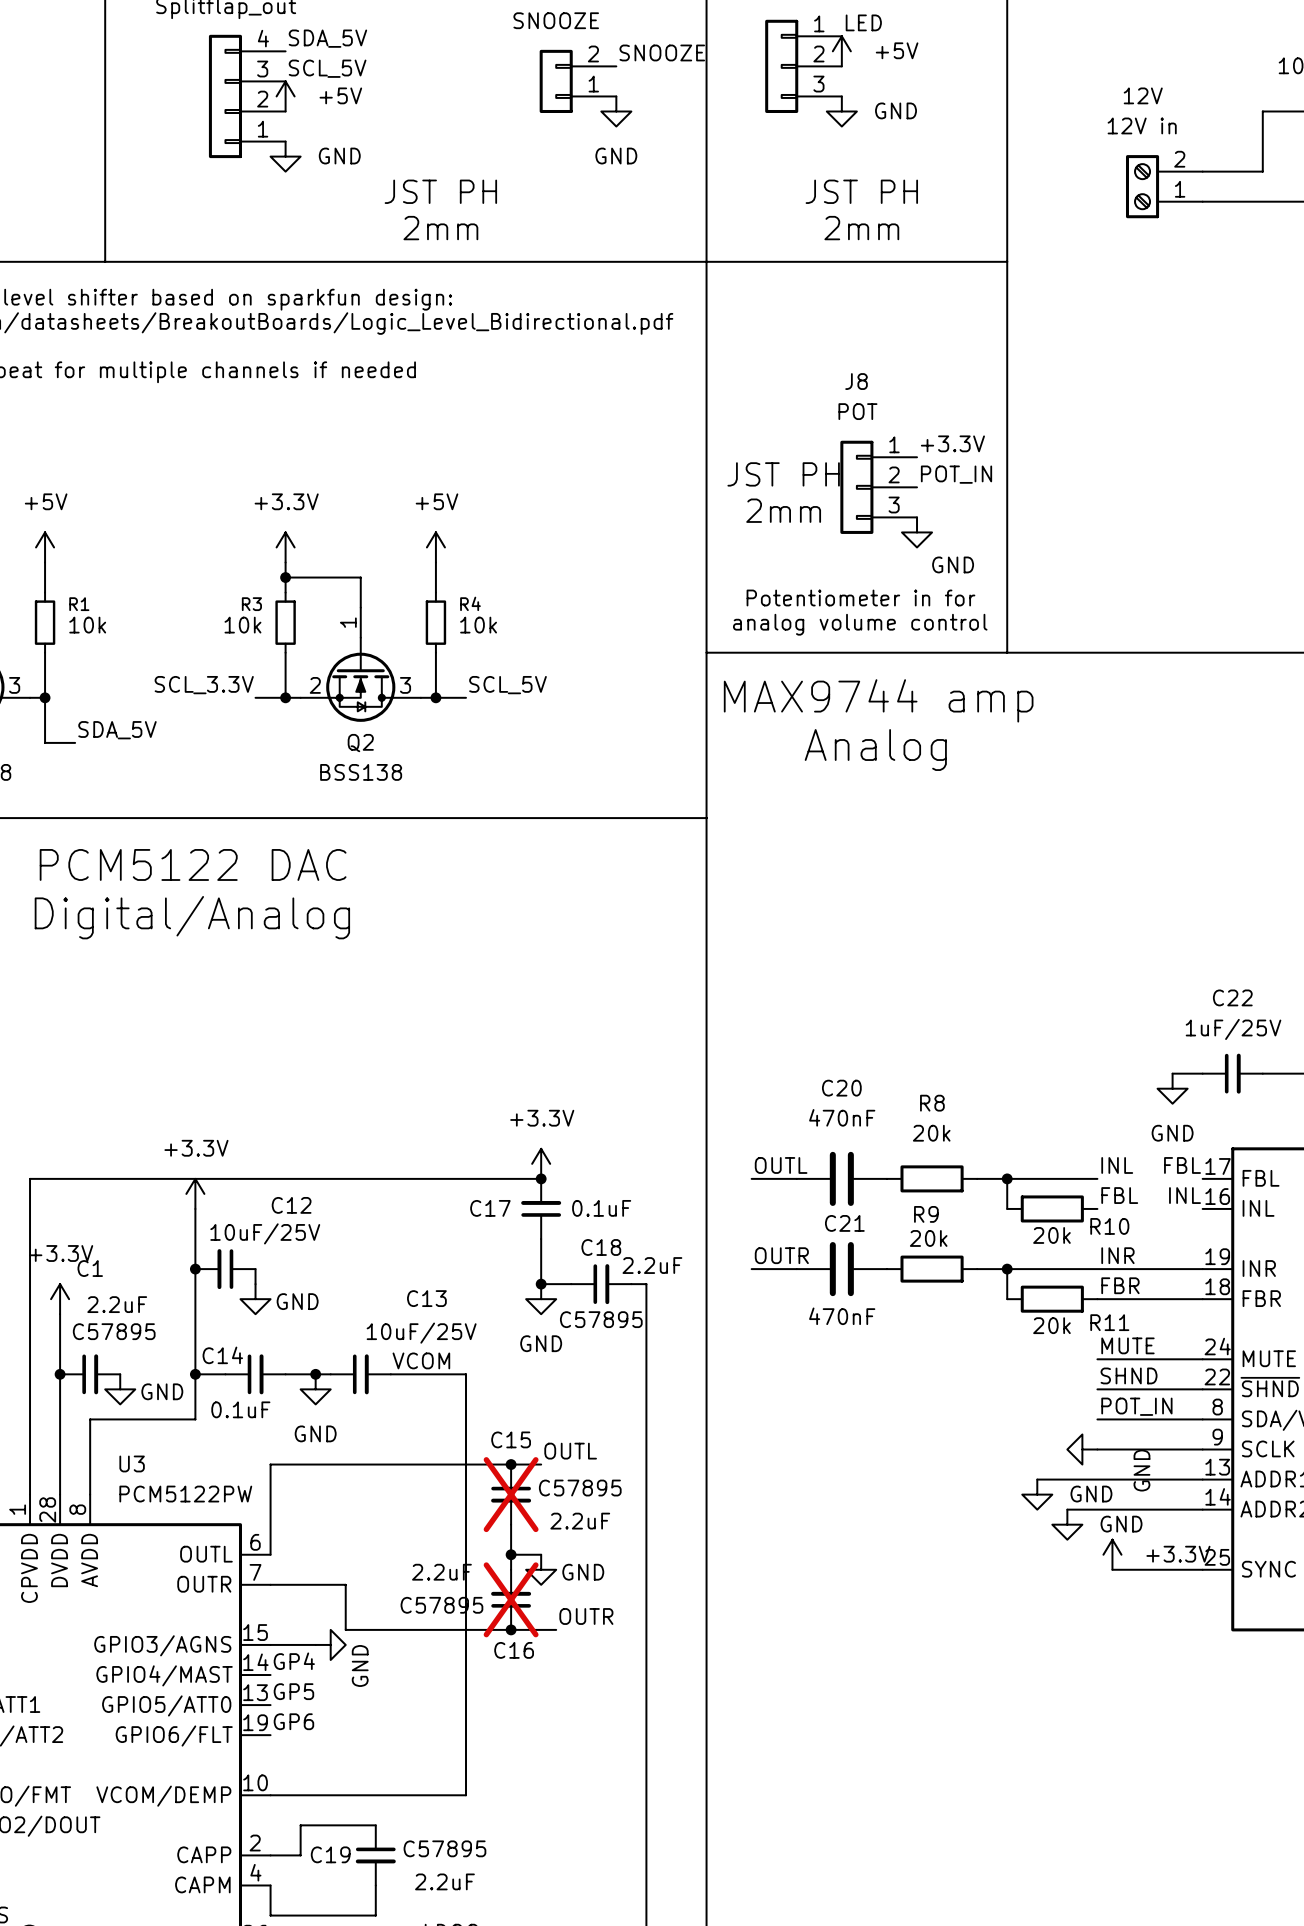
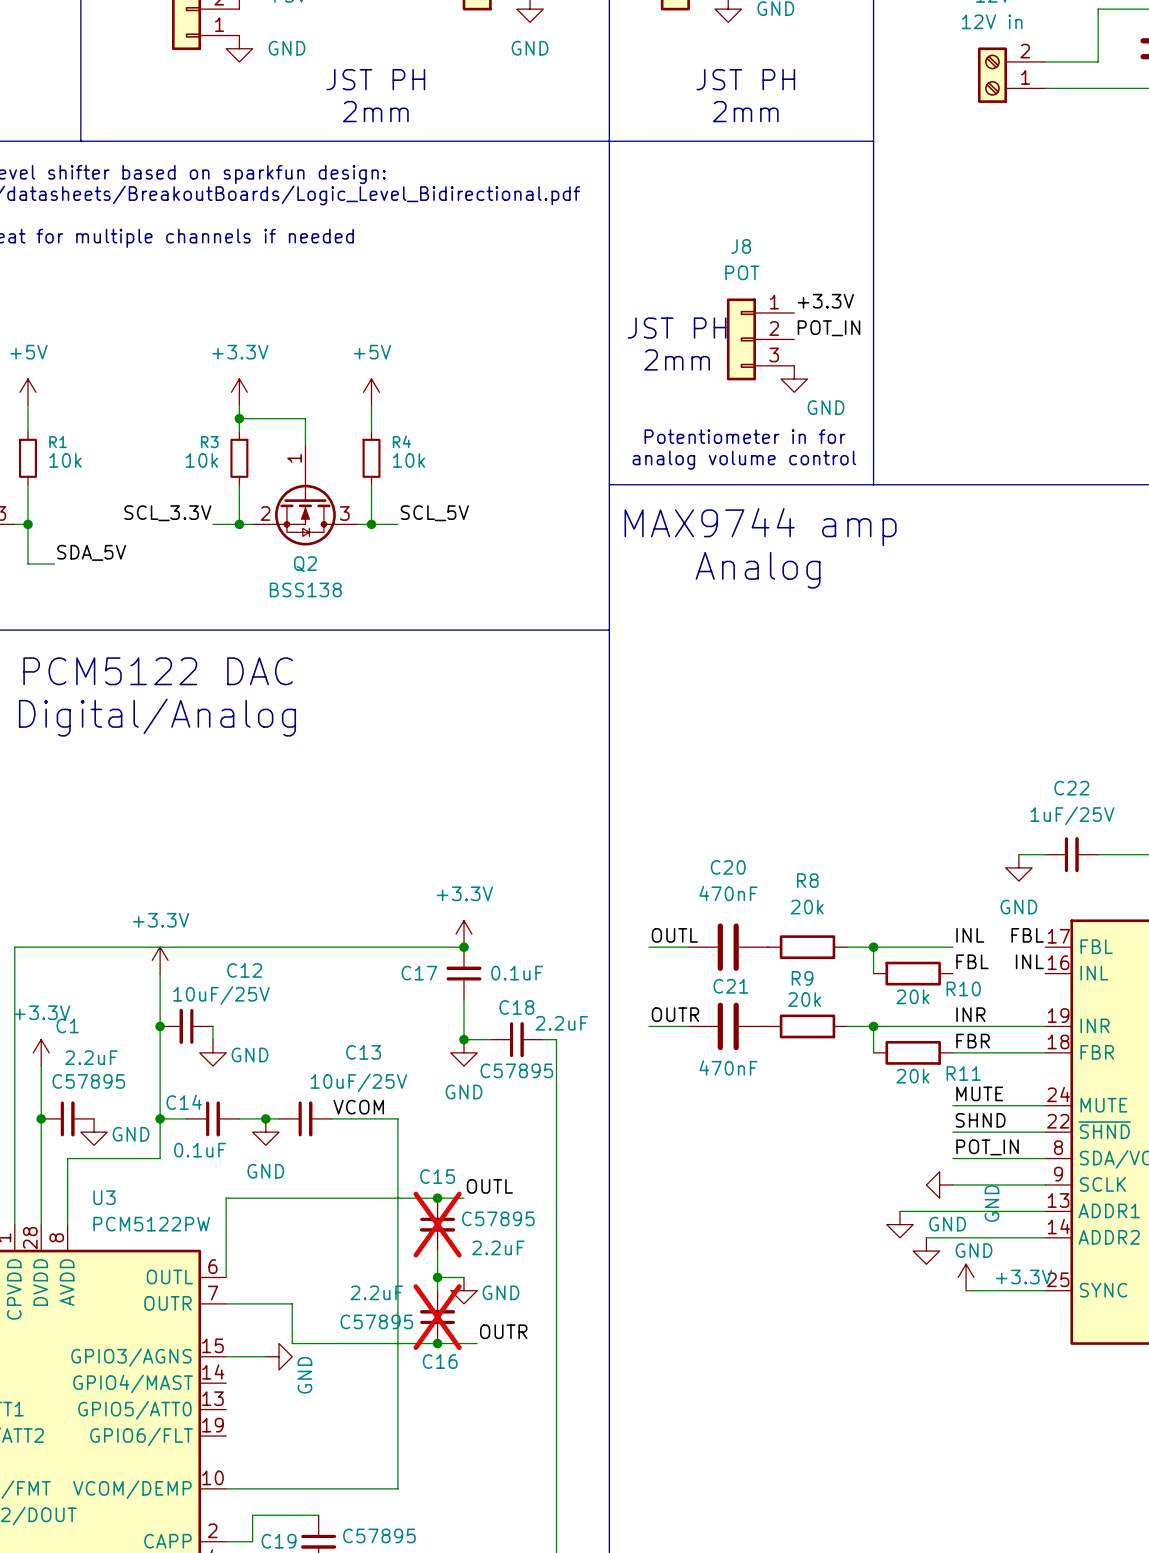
label: GP4 (294, 1661) -> none
label: GP5 (293, 1691) -> none
label: GP6 (293, 1721) -> none

